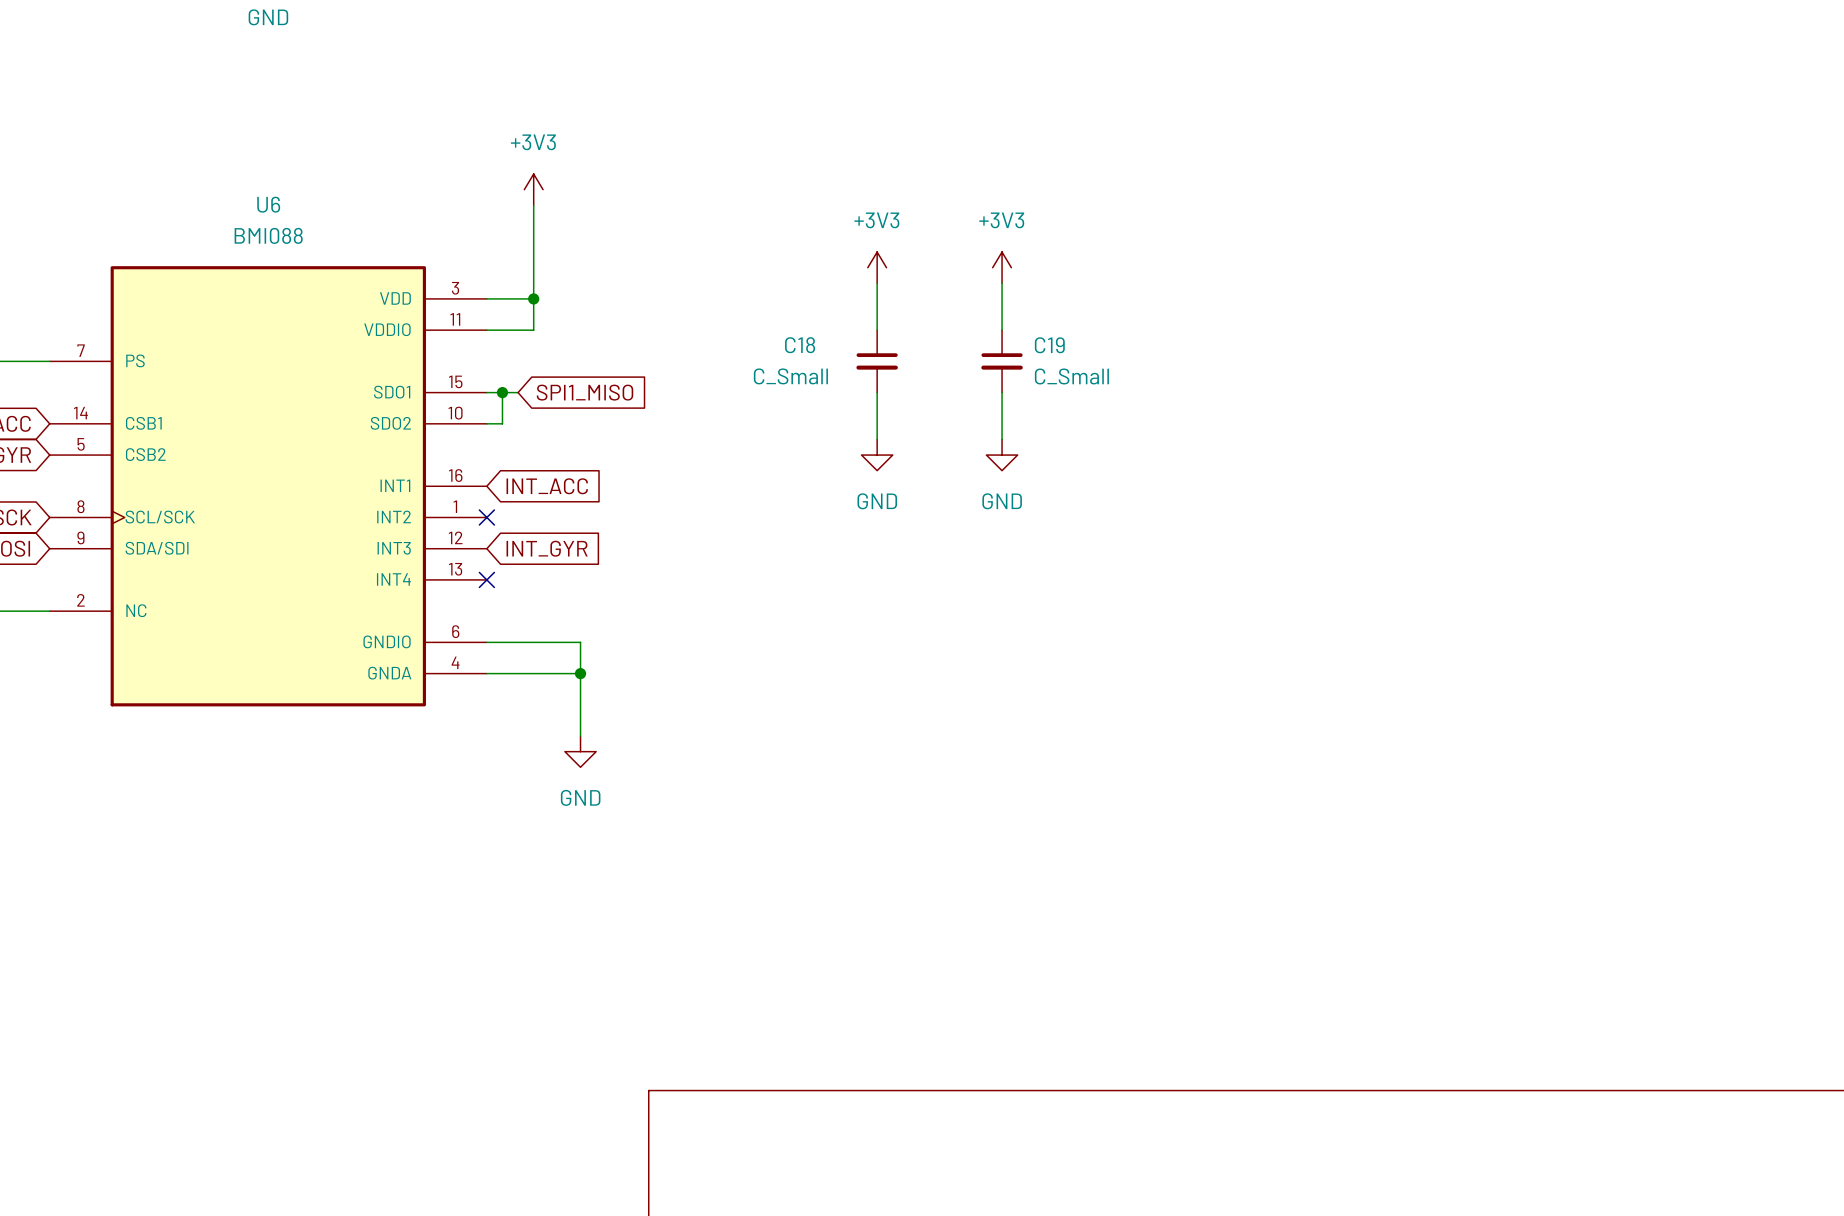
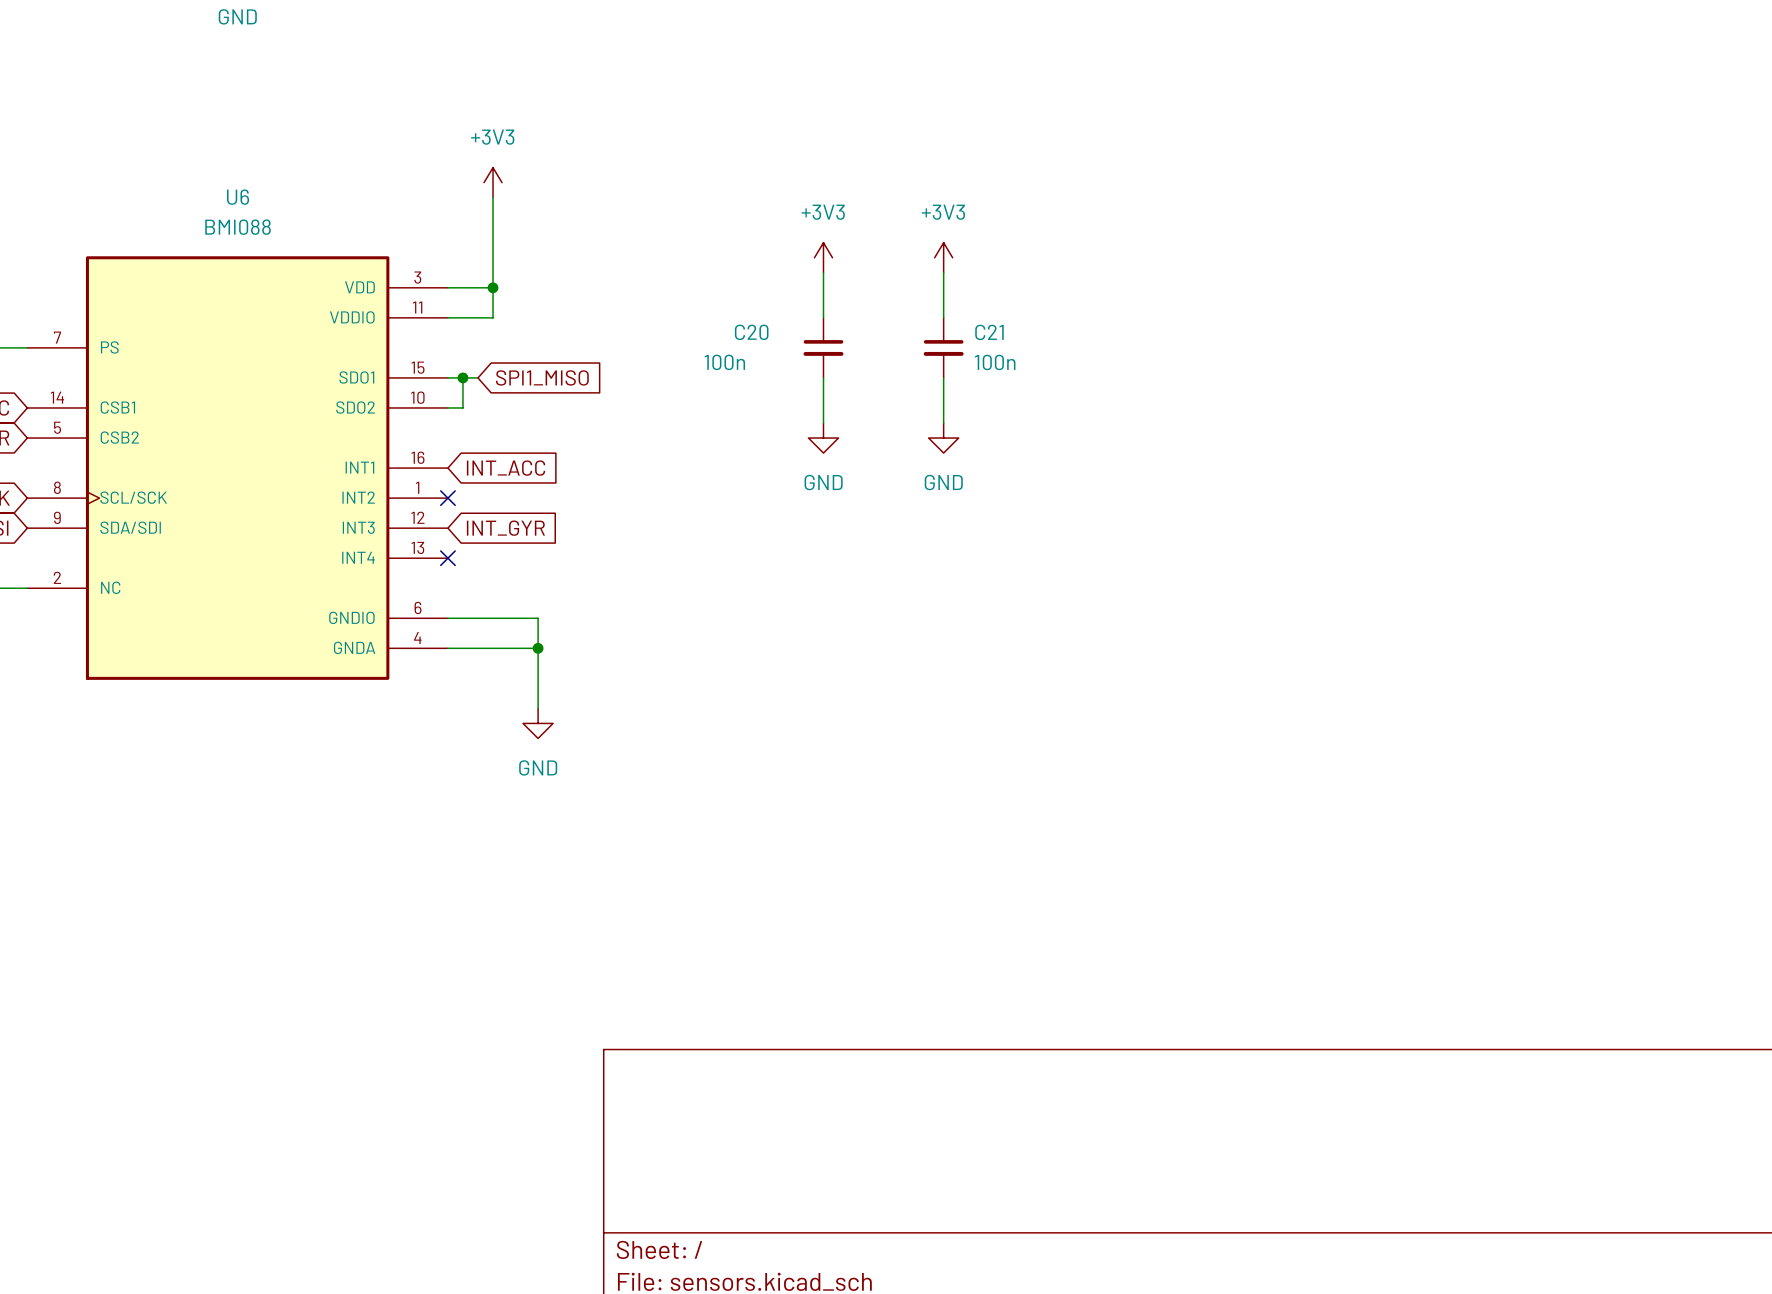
C18 name: C18 (800, 345) -> C20 (751, 332)
C19 name: C19 (1049, 345) -> C21 (989, 332)
C18 value: C_Small (790, 376) -> 100n (724, 362)
C19 value: C_Small (1071, 376) -> 100n (995, 362)

